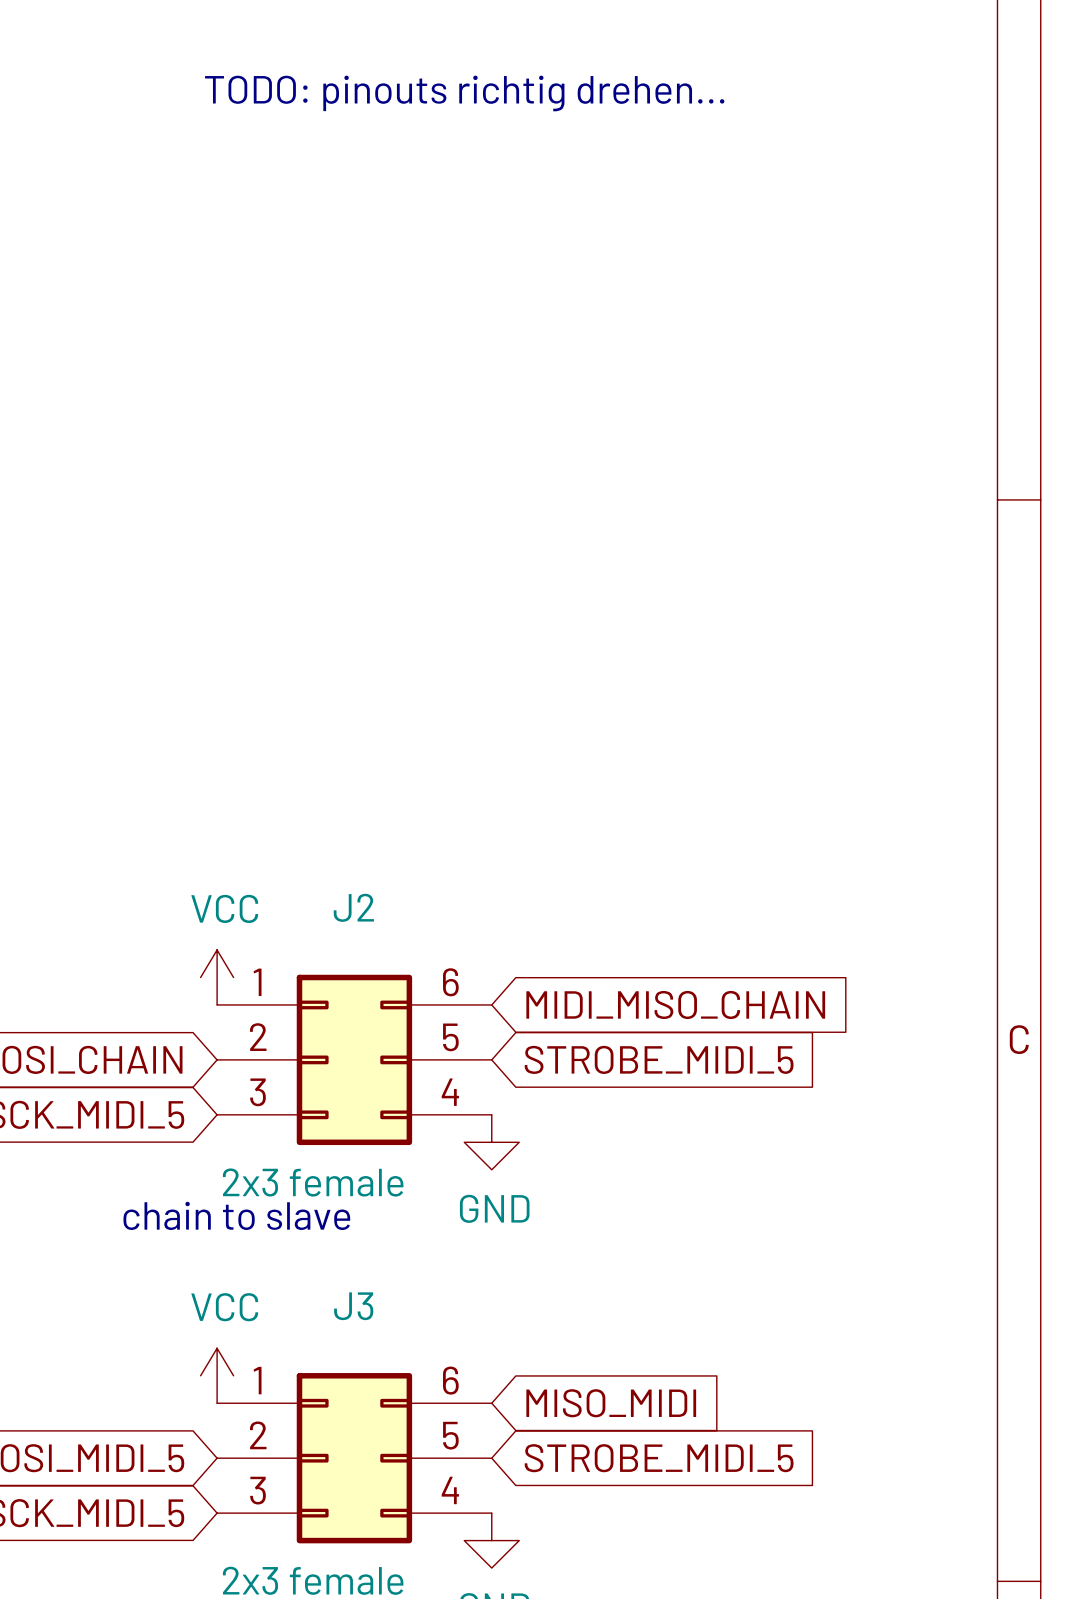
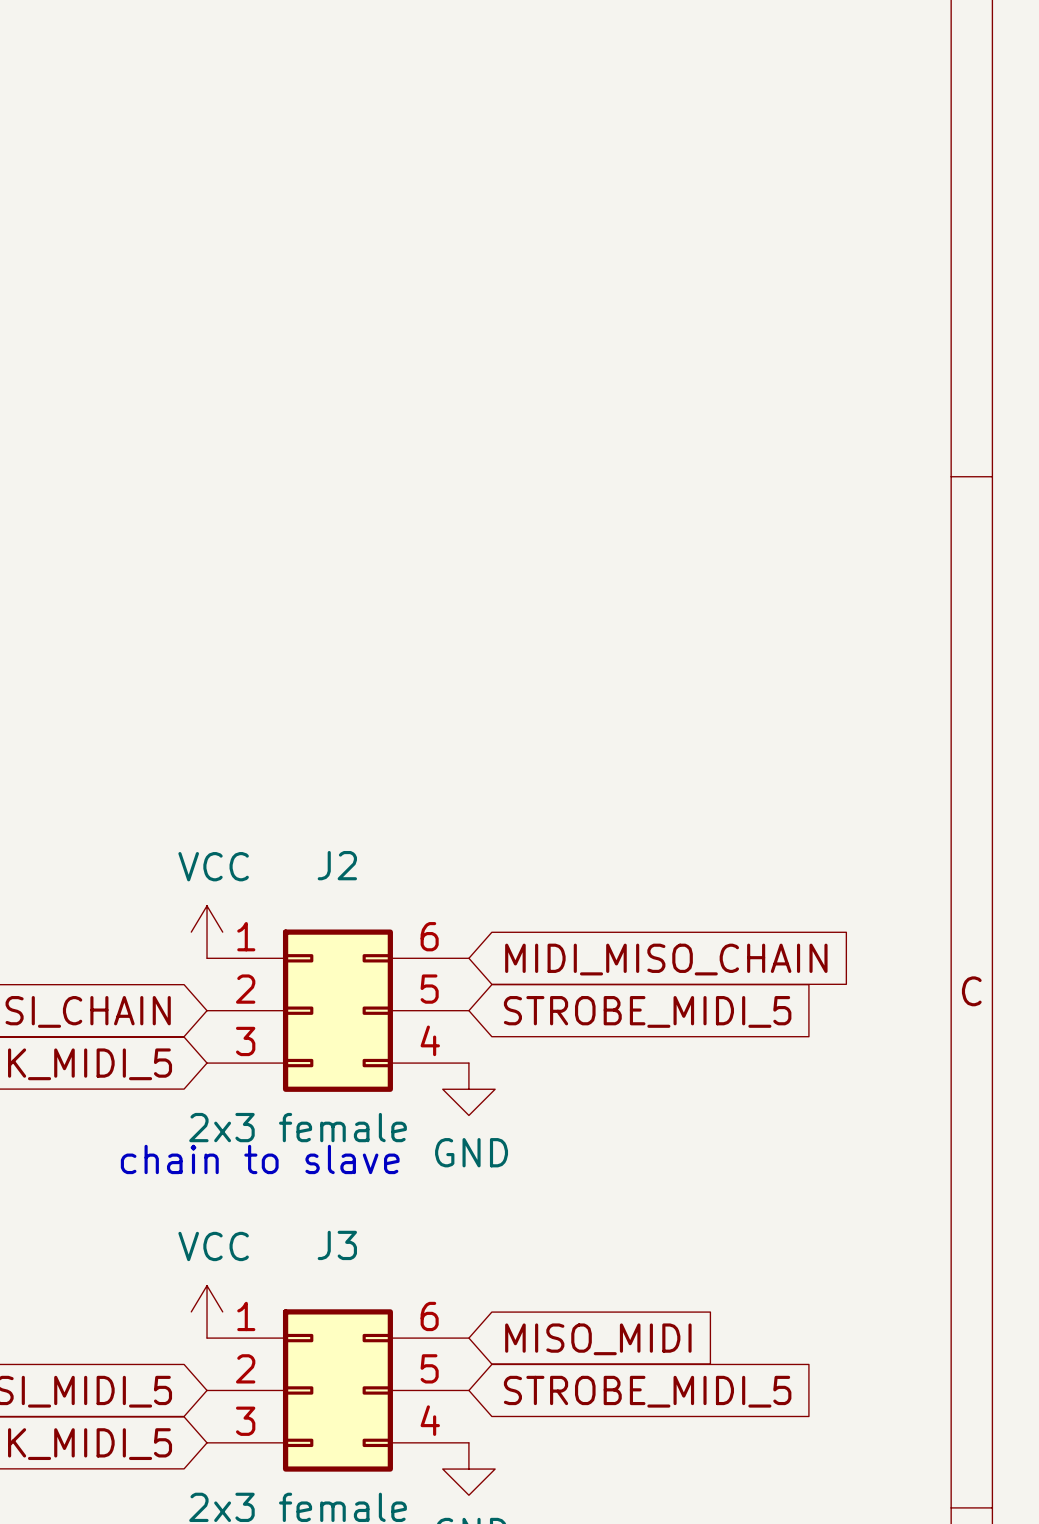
text: TODO: pinouts richtig drehen... (464, 93) -> none

